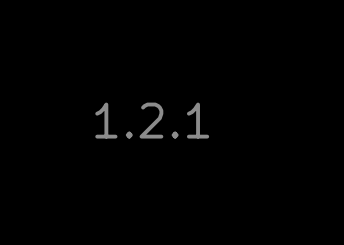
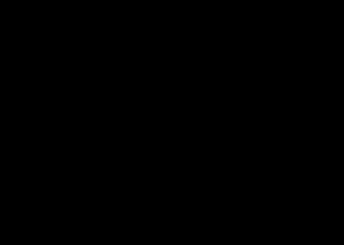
text: 1.2.1 (152, 120) -> none

